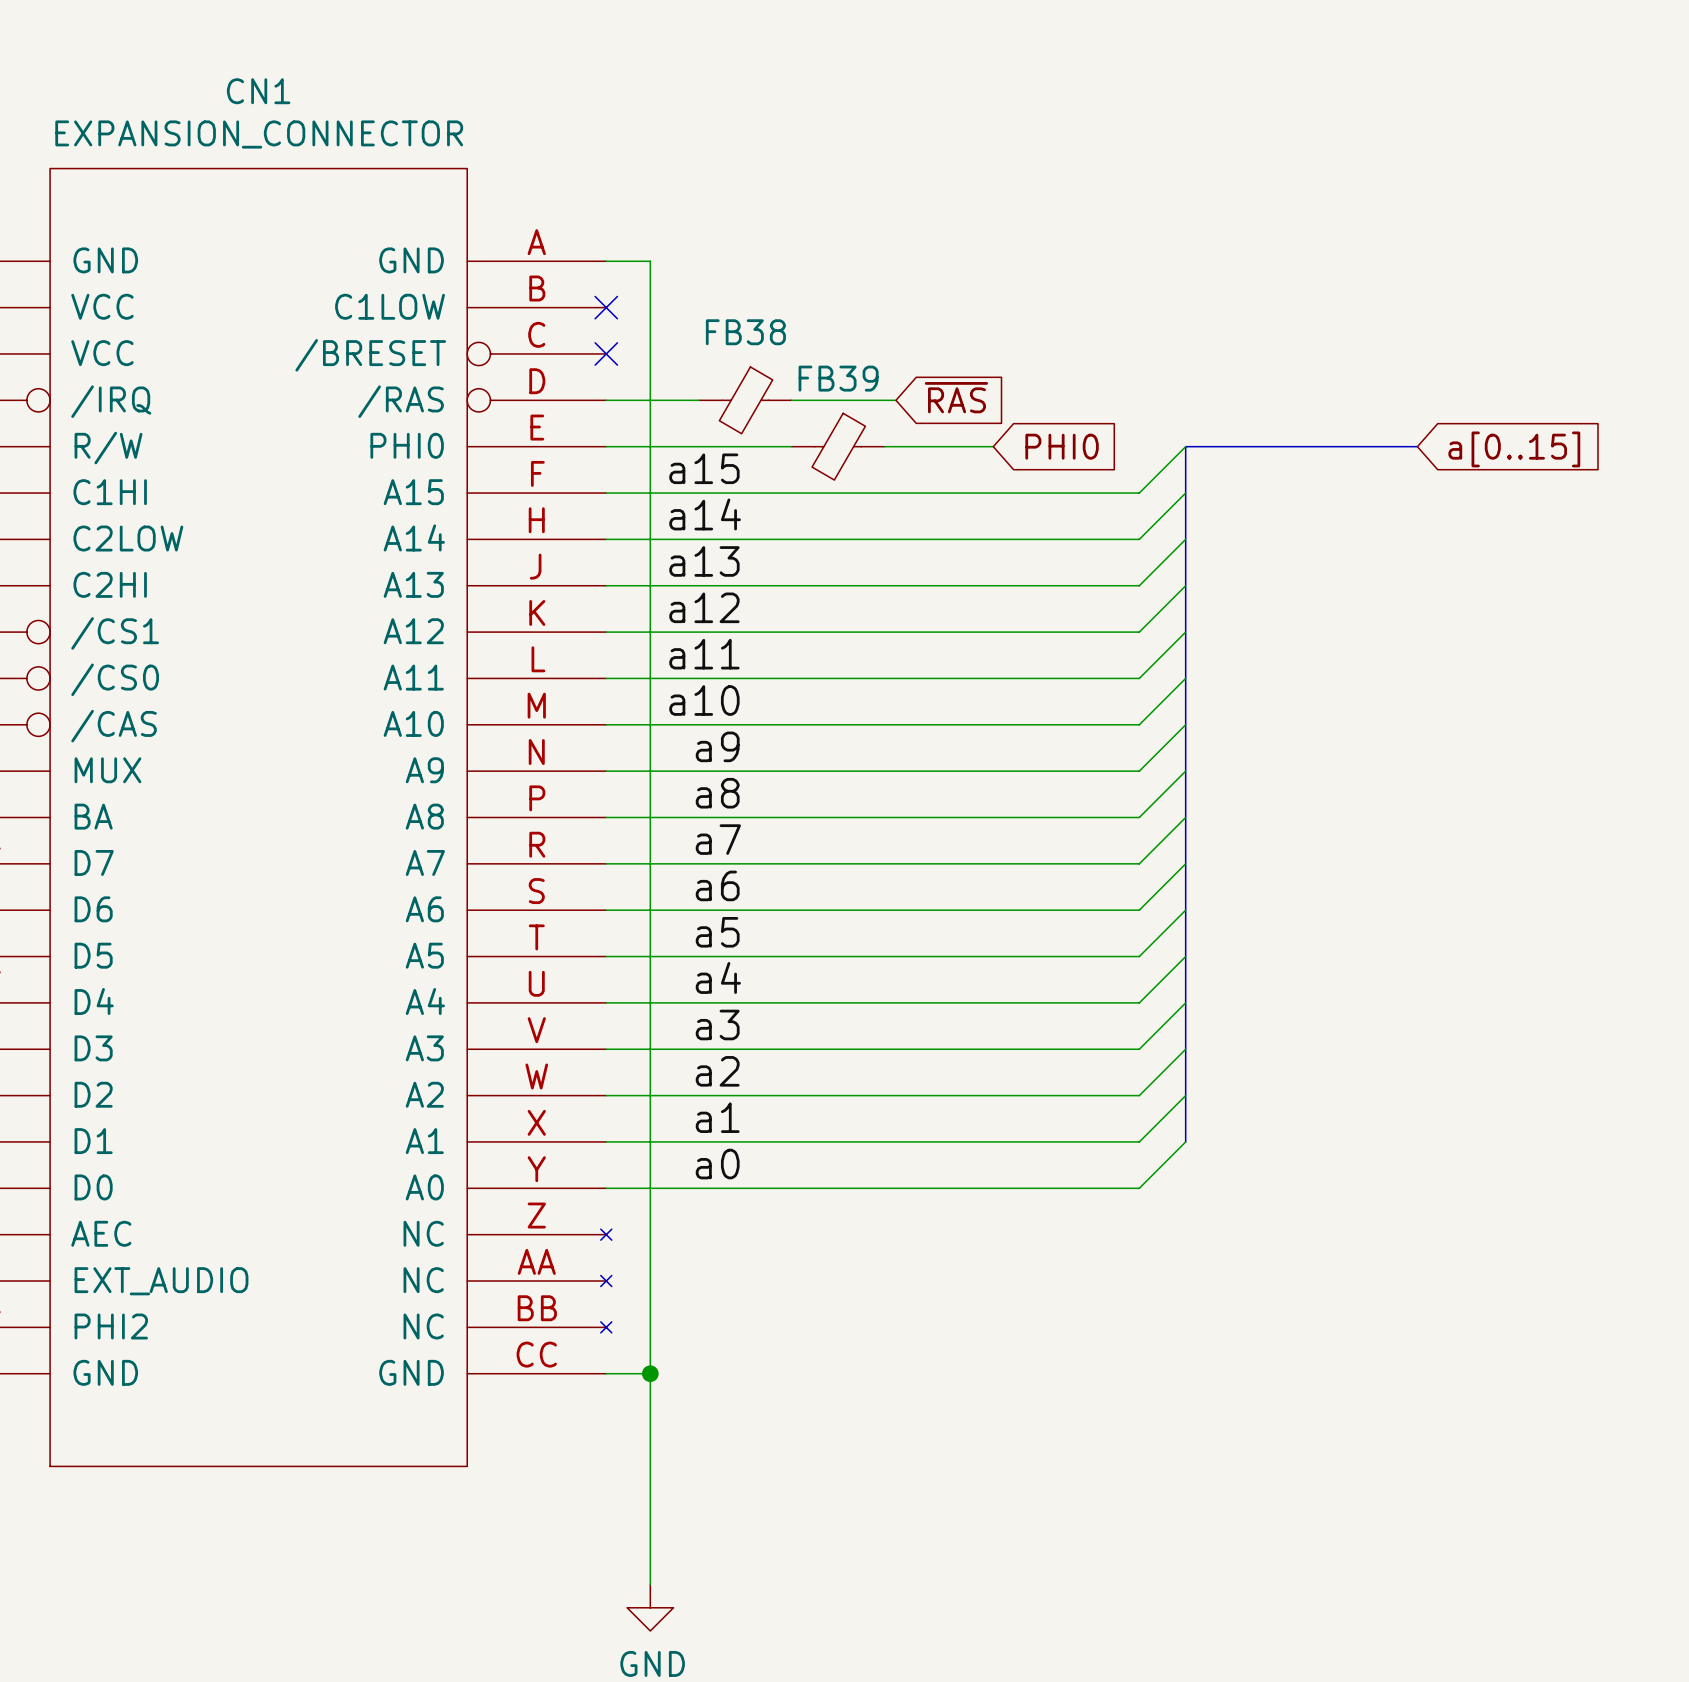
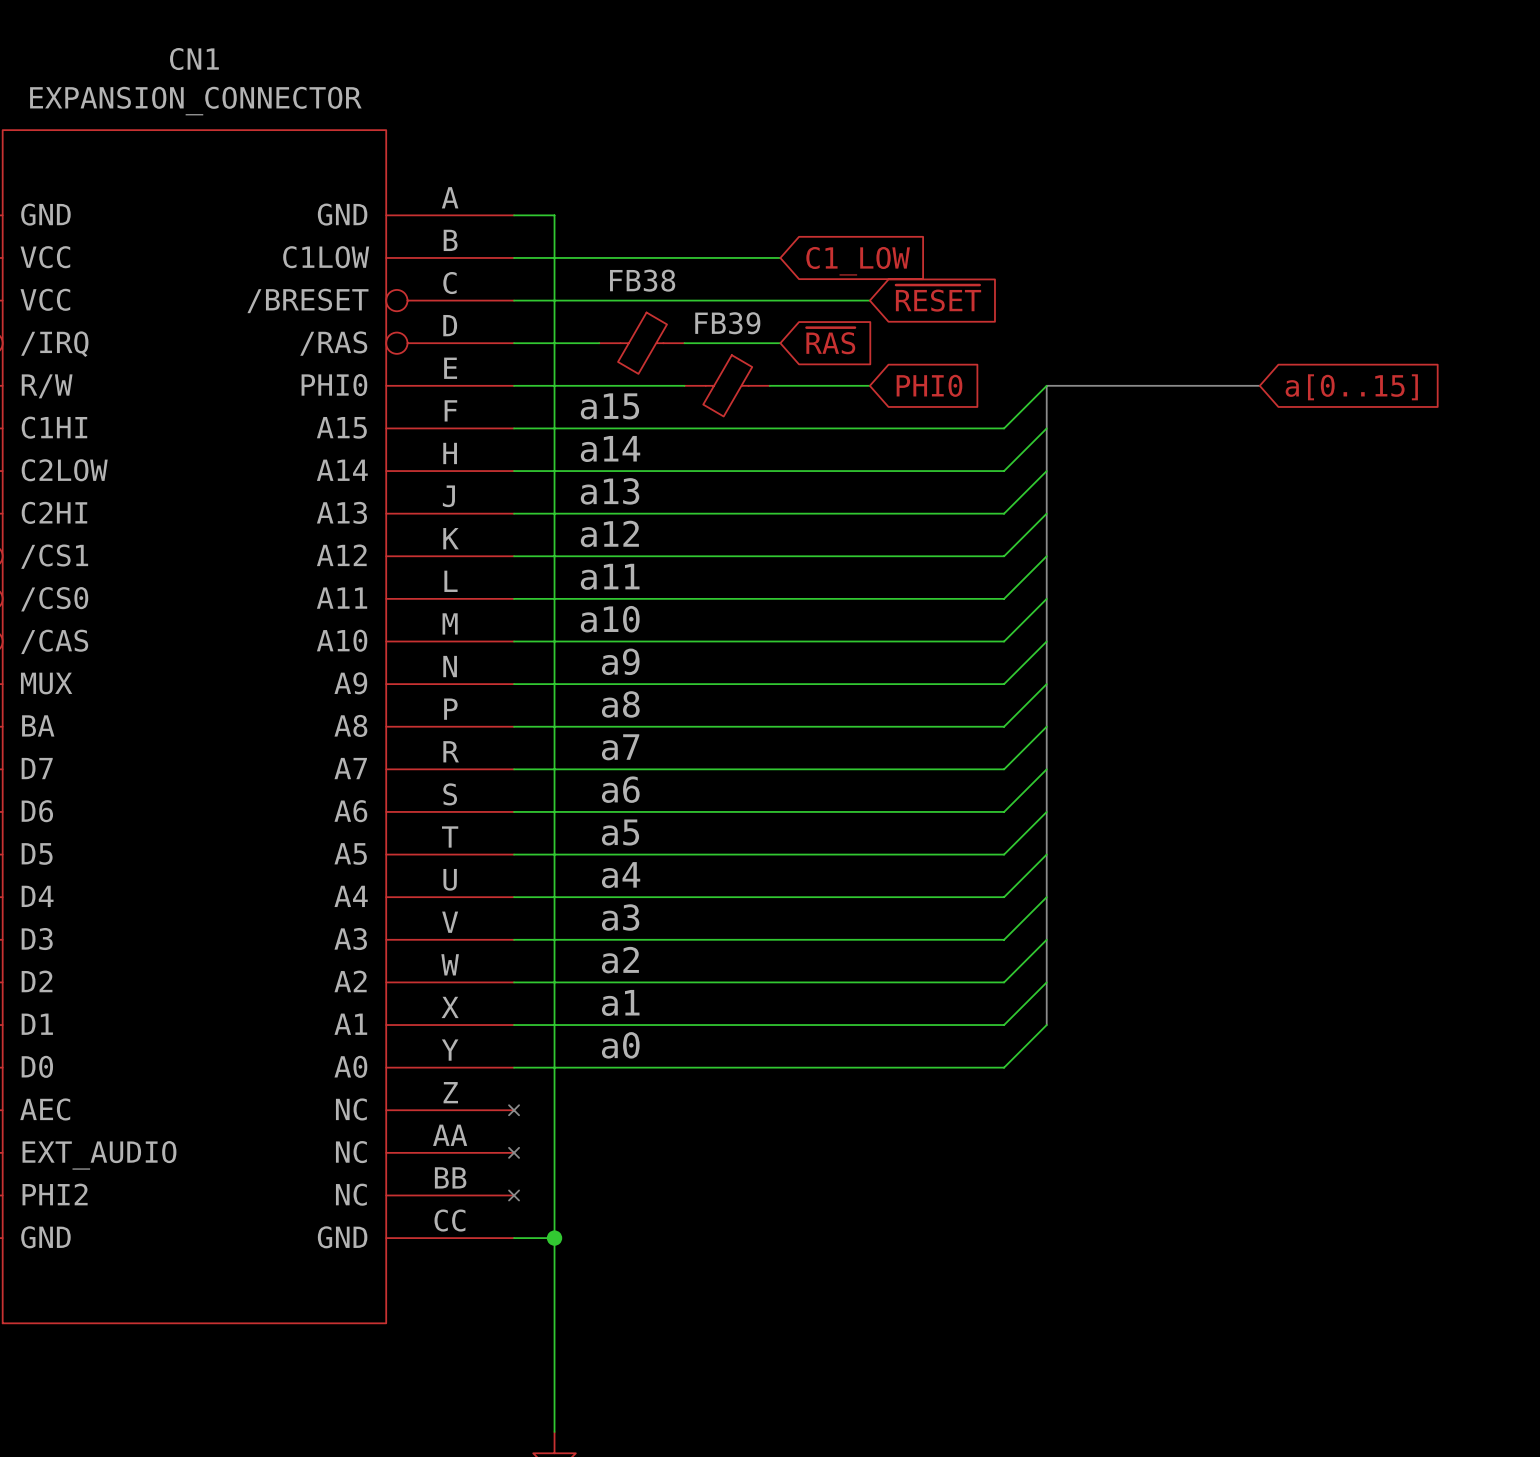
wire: none -> (514, 257) (780, 257)
no-connect mark: (606, 307) -> none
global label: none -> C1_LOW (858, 261)
global label: none -> ~{RESET} (938, 298)
wire: none -> (514, 300) (869, 300)
no-connect mark: (606, 353) -> none

